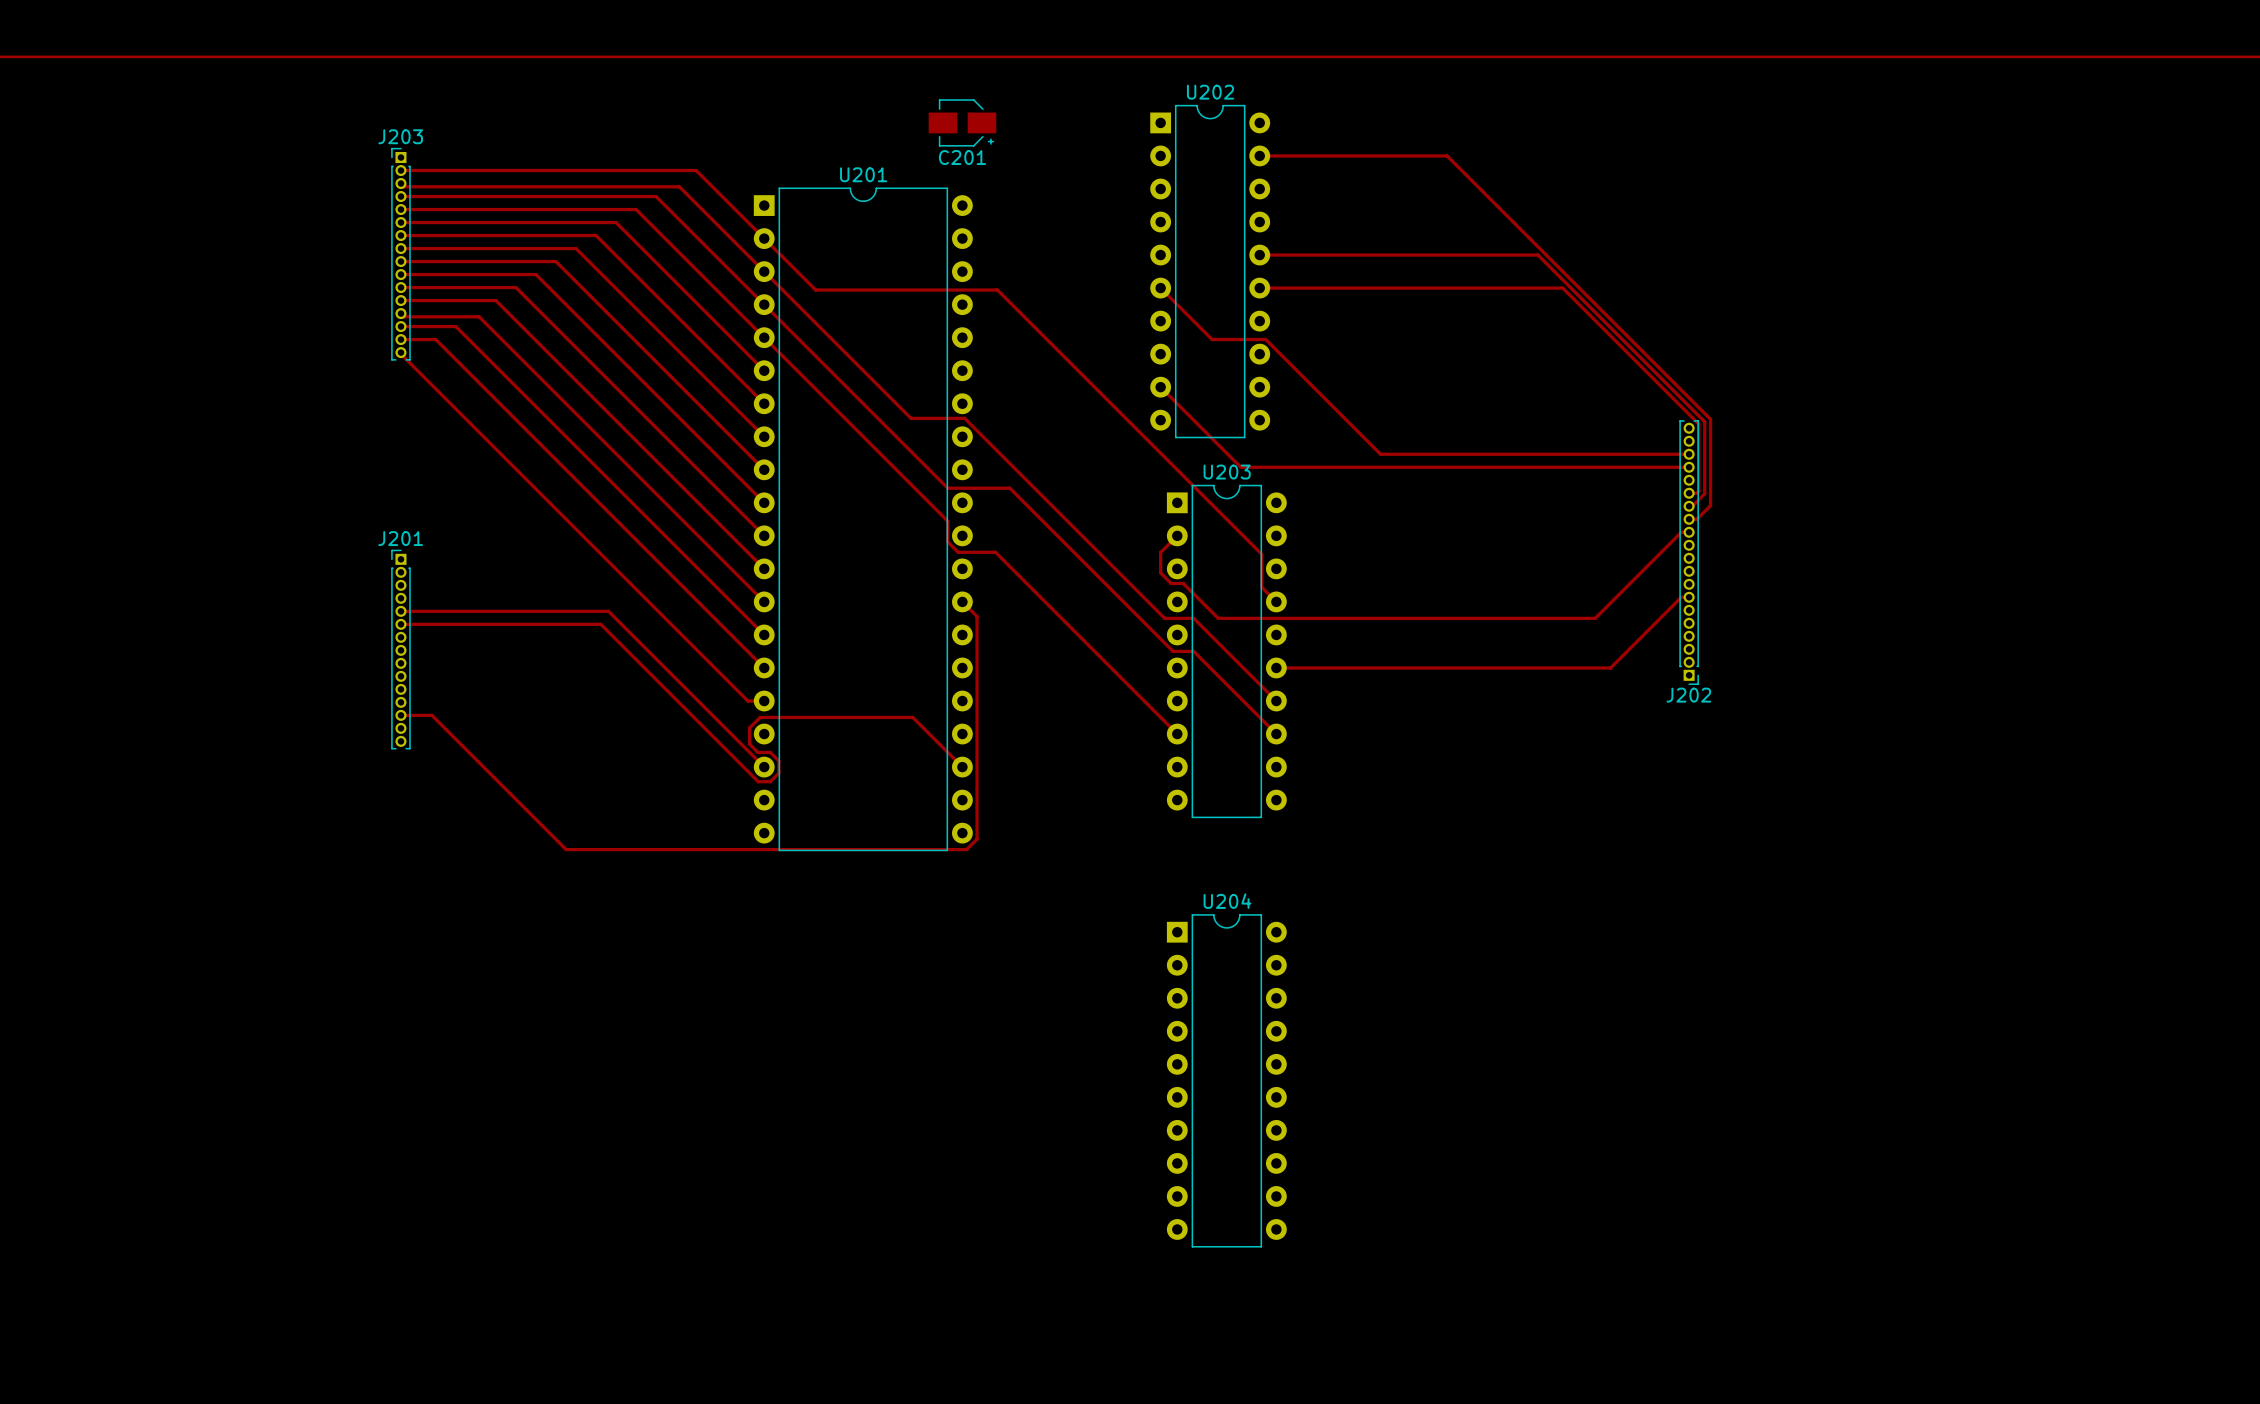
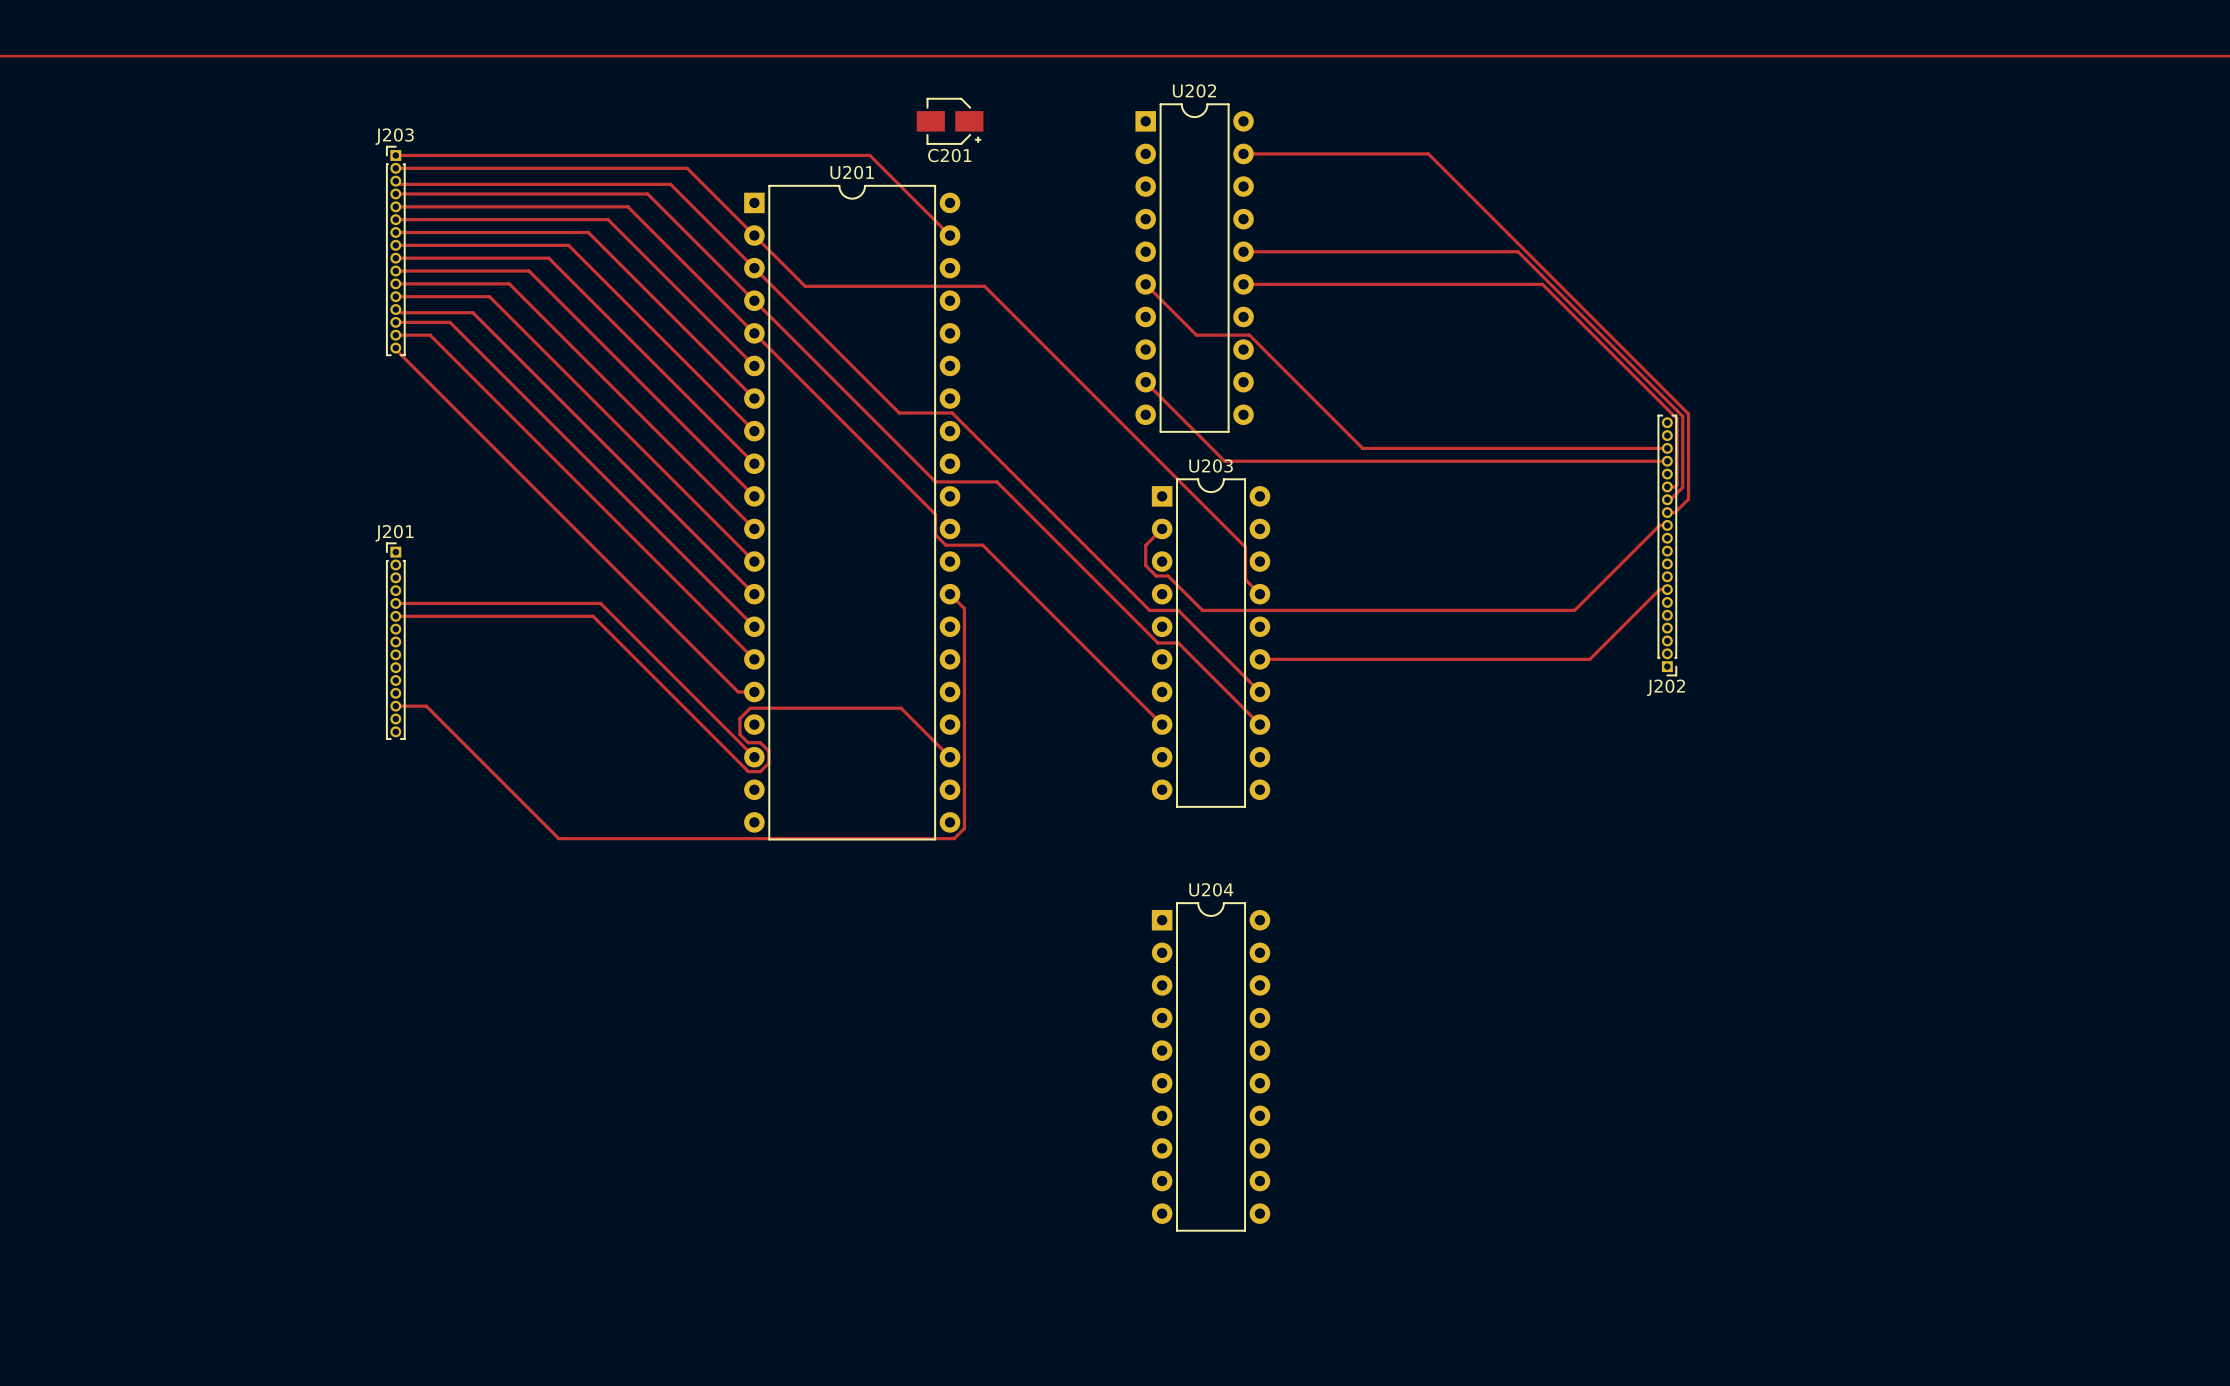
track: none -> (395, 155) (869, 155) (950, 235)

